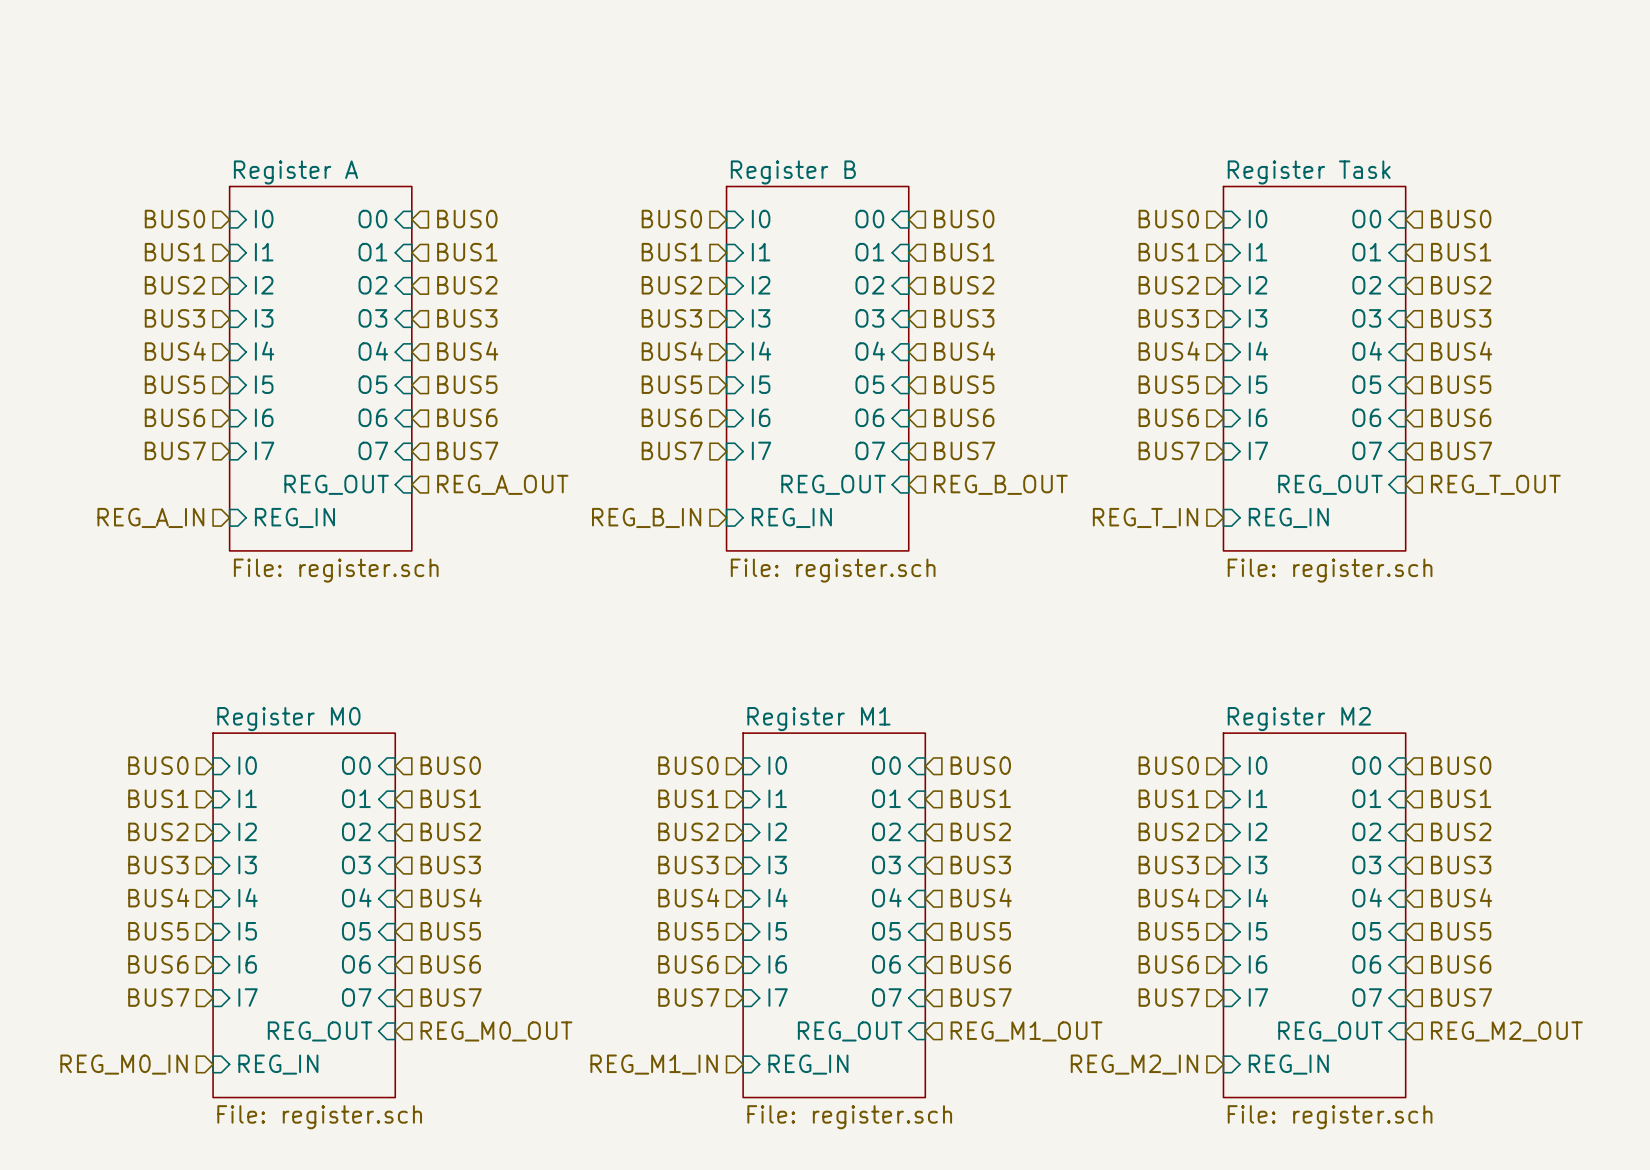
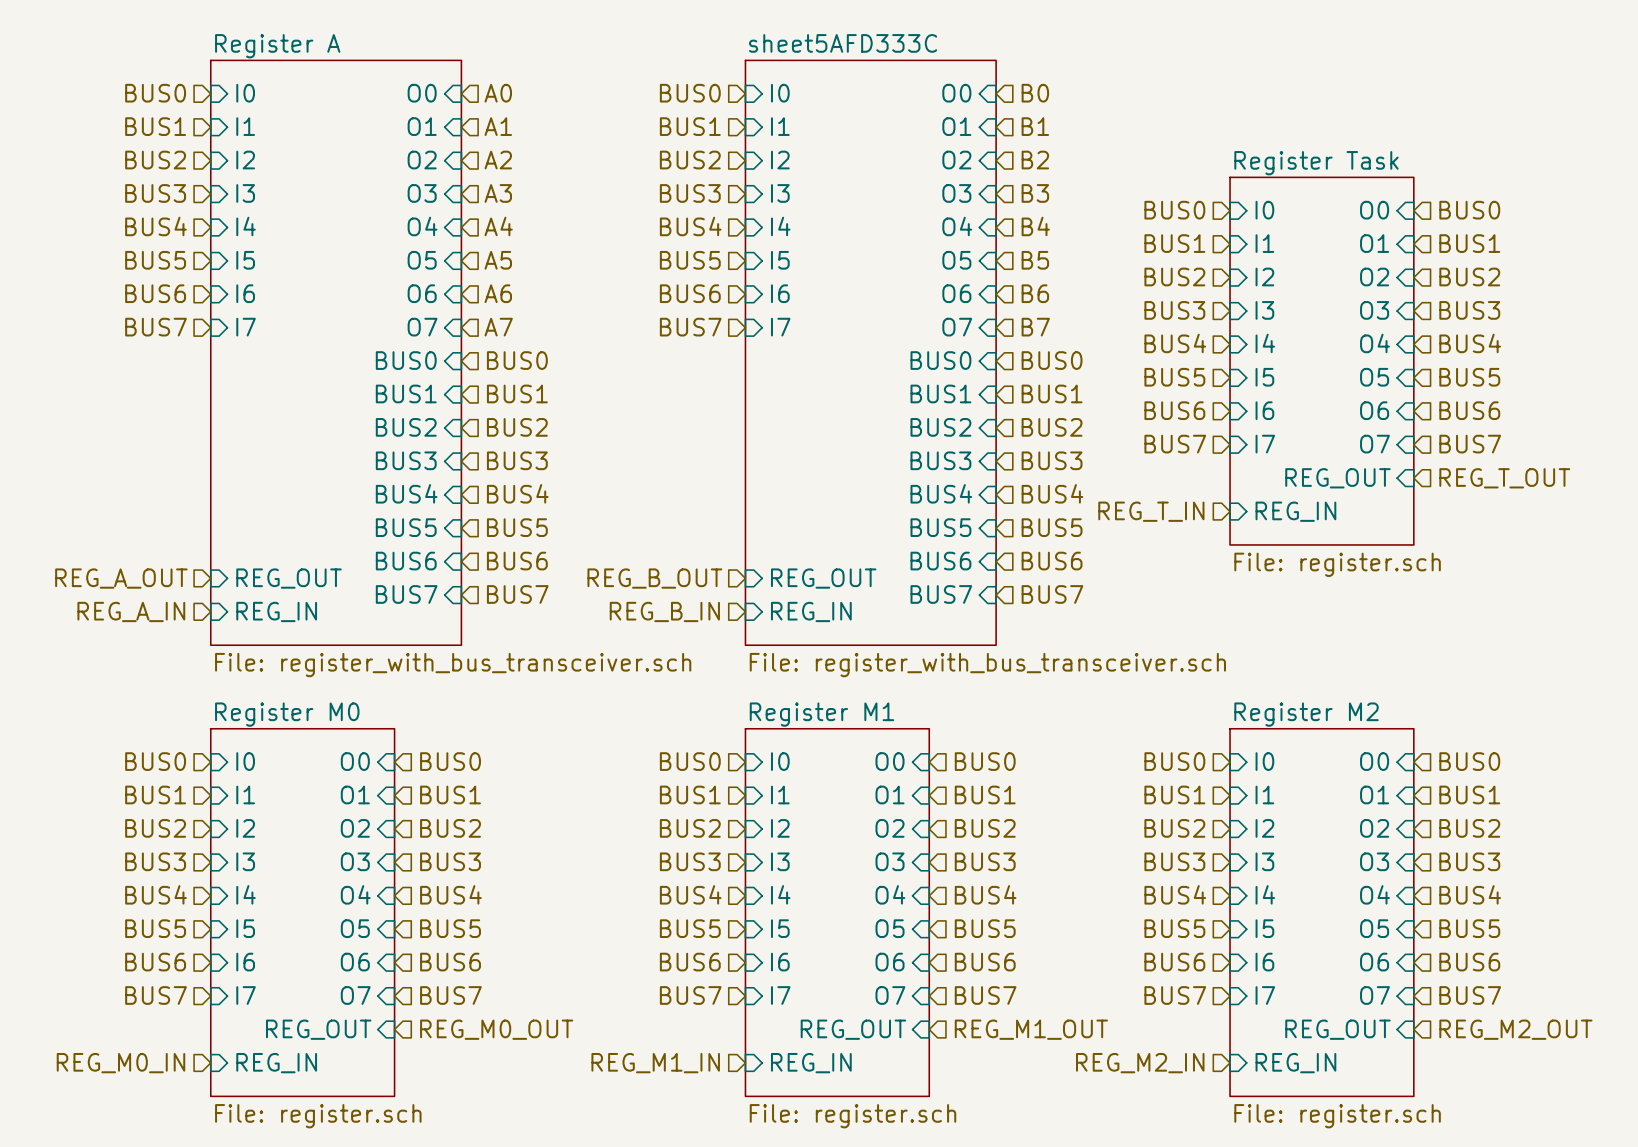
hierarchical label: none -> A0 (498, 93)
hierarchical label: none -> B0 (1035, 93)
hierarchical label: none -> A1 (498, 126)
hierarchical label: none -> B1 (1035, 126)
hierarchical label: none -> A2 (498, 160)
hierarchical label: none -> B2 (1035, 160)
hierarchical label: none -> A3 (498, 193)
hierarchical label: none -> B3 (1035, 193)
hierarchical label position: BUS0 (174, 219) -> BUS0 (155, 93)
sheet pin position: I0 (264, 219) -> I0 (245, 93)
sheet pin position: O0 (372, 219) -> O0 (422, 93)
hierarchical label: BUS0 (467, 219) -> none
hierarchical label position: BUS0 (671, 219) -> BUS0 (690, 93)
sheet pin position: I0 (761, 219) -> I0 (780, 93)
sheet pin position: O0 (869, 219) -> O0 (956, 93)
hierarchical label: BUS0 (964, 219) -> none
hierarchical label: none -> A4 (498, 226)
hierarchical label: none -> B4 (1035, 226)
hierarchical label position: BUS1 (174, 252) -> BUS1 (155, 126)
sheet pin position: I1 (264, 252) -> I1 (245, 126)
sheet pin position: O1 (372, 252) -> O1 (422, 126)
hierarchical label: BUS1 (467, 252) -> none
hierarchical label position: BUS1 (671, 252) -> BUS1 (690, 126)
sheet pin position: I1 (761, 252) -> I1 (780, 126)
sheet pin position: O1 (869, 252) -> O1 (956, 126)
hierarchical label: BUS1 (964, 252) -> none
hierarchical label: none -> A5 (498, 260)
hierarchical label: none -> B5 (1035, 260)
hierarchical label position: BUS2 (174, 285) -> BUS2 (155, 160)
sheet pin position: I2 (264, 285) -> I2 (245, 160)
sheet pin position: O2 (372, 285) -> O2 (422, 160)
hierarchical label: BUS2 (467, 285) -> none
hierarchical label position: BUS2 (671, 285) -> BUS2 (690, 160)
sheet pin position: I2 (761, 285) -> I2 (780, 160)
sheet pin position: O2 (869, 285) -> O2 (956, 160)
hierarchical label: BUS2 (964, 285) -> none
hierarchical label: none -> A6 (498, 293)
hierarchical label: none -> B6 (1035, 293)
hierarchical label position: BUS3 (174, 318) -> BUS3 (155, 193)
sheet pin position: I3 (264, 318) -> I3 (245, 193)
sheet pin position: O3 (372, 318) -> O3 (422, 193)
hierarchical label: BUS3 (467, 318) -> none
hierarchical label position: BUS3 (671, 318) -> BUS3 (690, 193)
sheet pin position: I3 (761, 318) -> I3 (780, 193)
sheet pin position: O3 (869, 318) -> O3 (956, 193)
hierarchical label: BUS3 (964, 318) -> none
hierarchical label: none -> A7 (498, 327)
hierarchical label: none -> B7 (1035, 327)
hierarchical label position: BUS4 (175, 351) -> BUS4 (156, 226)
sheet pin position: I4 (264, 351) -> I4 (246, 226)
sheet pin position: O4 (373, 351) -> O4 (422, 226)
hierarchical label: BUS4 (467, 351) -> none
hierarchical label position: BUS4 (672, 351) -> BUS4 (690, 226)
sheet pin position: I4 (761, 351) -> I4 (780, 226)
sheet pin position: O4 (870, 351) -> O4 (957, 226)
hierarchical label: BUS4 (964, 351) -> none
sheet Register A: none -> File: register_with_bus_transceiver.sch (336, 352)
sheet sheet5AFD333C: none -> File: register_with_bus_transceiver.sch (870, 352)
sheet Register A: File: register.sch (320, 368) -> none
sheet pin: none -> BUS0 (406, 360)
hierarchical label: none -> BUS0 (517, 360)
sheet Register B: File: register.sch (817, 368) -> none
sheet pin: none -> BUS0 (940, 360)
hierarchical label: none -> BUS0 (1052, 360)
hierarchical label position: BUS5 (174, 384) -> BUS5 (155, 260)
sheet pin position: I5 (264, 384) -> I5 (245, 260)
sheet pin position: O5 (372, 384) -> O5 (422, 260)
hierarchical label: BUS5 (467, 384) -> none
hierarchical label position: BUS5 (671, 384) -> BUS5 (690, 260)
sheet pin position: I5 (761, 384) -> I5 (780, 260)
sheet pin position: O5 (869, 384) -> O5 (956, 260)
hierarchical label: BUS5 (964, 384) -> none
sheet pin: none -> BUS1 (406, 393)
hierarchical label: none -> BUS1 (517, 393)
sheet pin: none -> BUS1 (940, 393)
hierarchical label: none -> BUS1 (1052, 393)
hierarchical label position: BUS6 (174, 417) -> BUS6 (155, 293)
sheet pin position: I6 (264, 417) -> I6 (245, 293)
sheet pin position: O6 (372, 417) -> O6 (422, 293)
hierarchical label: BUS6 (467, 417) -> none
hierarchical label position: BUS6 (671, 417) -> BUS6 (690, 293)
sheet pin position: I6 (761, 417) -> I6 (780, 293)
sheet pin position: O6 (869, 417) -> O6 (956, 293)
hierarchical label: BUS6 (964, 417) -> none
sheet pin: none -> BUS2 (406, 427)
hierarchical label: none -> BUS2 (517, 427)
sheet pin: none -> BUS2 (940, 427)
hierarchical label: none -> BUS2 (1052, 427)
hierarchical label position: BUS7 (175, 450) -> BUS7 (156, 327)
sheet pin position: I7 (264, 450) -> I7 (246, 327)
sheet pin position: O7 (373, 450) -> O7 (422, 327)
hierarchical label: BUS7 (467, 450) -> none
hierarchical label position: BUS7 (672, 450) -> BUS7 (690, 327)
sheet pin position: I7 (761, 450) -> I7 (780, 327)
sheet pin position: O7 (870, 450) -> O7 (957, 327)
hierarchical label: BUS7 (964, 450) -> none
sheet pin: none -> BUS3 (406, 460)
hierarchical label: none -> BUS3 (517, 460)
sheet pin: none -> BUS3 (940, 460)
hierarchical label: none -> BUS3 (1052, 460)
sheet pin rotation: 0° (336, 484) -> 180° (289, 578)
hierarchical label rotation: 0° (502, 484) -> 180° (121, 578)
hierarchical label position: REG_A_OUT (502, 484) -> REG_A_OUT (121, 578)
sheet pin rotation: 0° (833, 484) -> 180° (823, 578)
hierarchical label rotation: 0° (1000, 484) -> 180° (654, 578)
hierarchical label position: REG_B_OUT (1000, 484) -> REG_B_OUT (654, 578)
sheet pin: none -> BUS4 (406, 493)
hierarchical label: none -> BUS4 (517, 493)
sheet pin: none -> BUS4 (941, 493)
hierarchical label: none -> BUS4 (1052, 493)
hierarchical label position: REG_A_IN (150, 517) -> REG_A_IN (131, 611)
sheet pin position: REG_IN (294, 517) -> REG_IN (276, 611)
hierarchical label position: REG_B_IN (646, 517) -> REG_B_IN (664, 611)
sheet pin position: REG_IN (791, 517) -> REG_IN (811, 611)
sheet pin: none -> BUS5 (406, 527)
hierarchical label: none -> BUS5 (517, 527)
sheet pin: none -> BUS5 (940, 527)
hierarchical label: none -> BUS5 (1052, 527)
sheet pin: none -> BUS6 (406, 561)
hierarchical label: none -> BUS6 (517, 561)
sheet pin: none -> BUS6 (940, 561)
hierarchical label: none -> BUS6 (1052, 561)
sheet pin: none -> BUS7 (406, 594)
hierarchical label: none -> BUS7 (517, 594)
sheet pin: none -> BUS7 (941, 594)
hierarchical label: none -> BUS7 (1052, 594)

